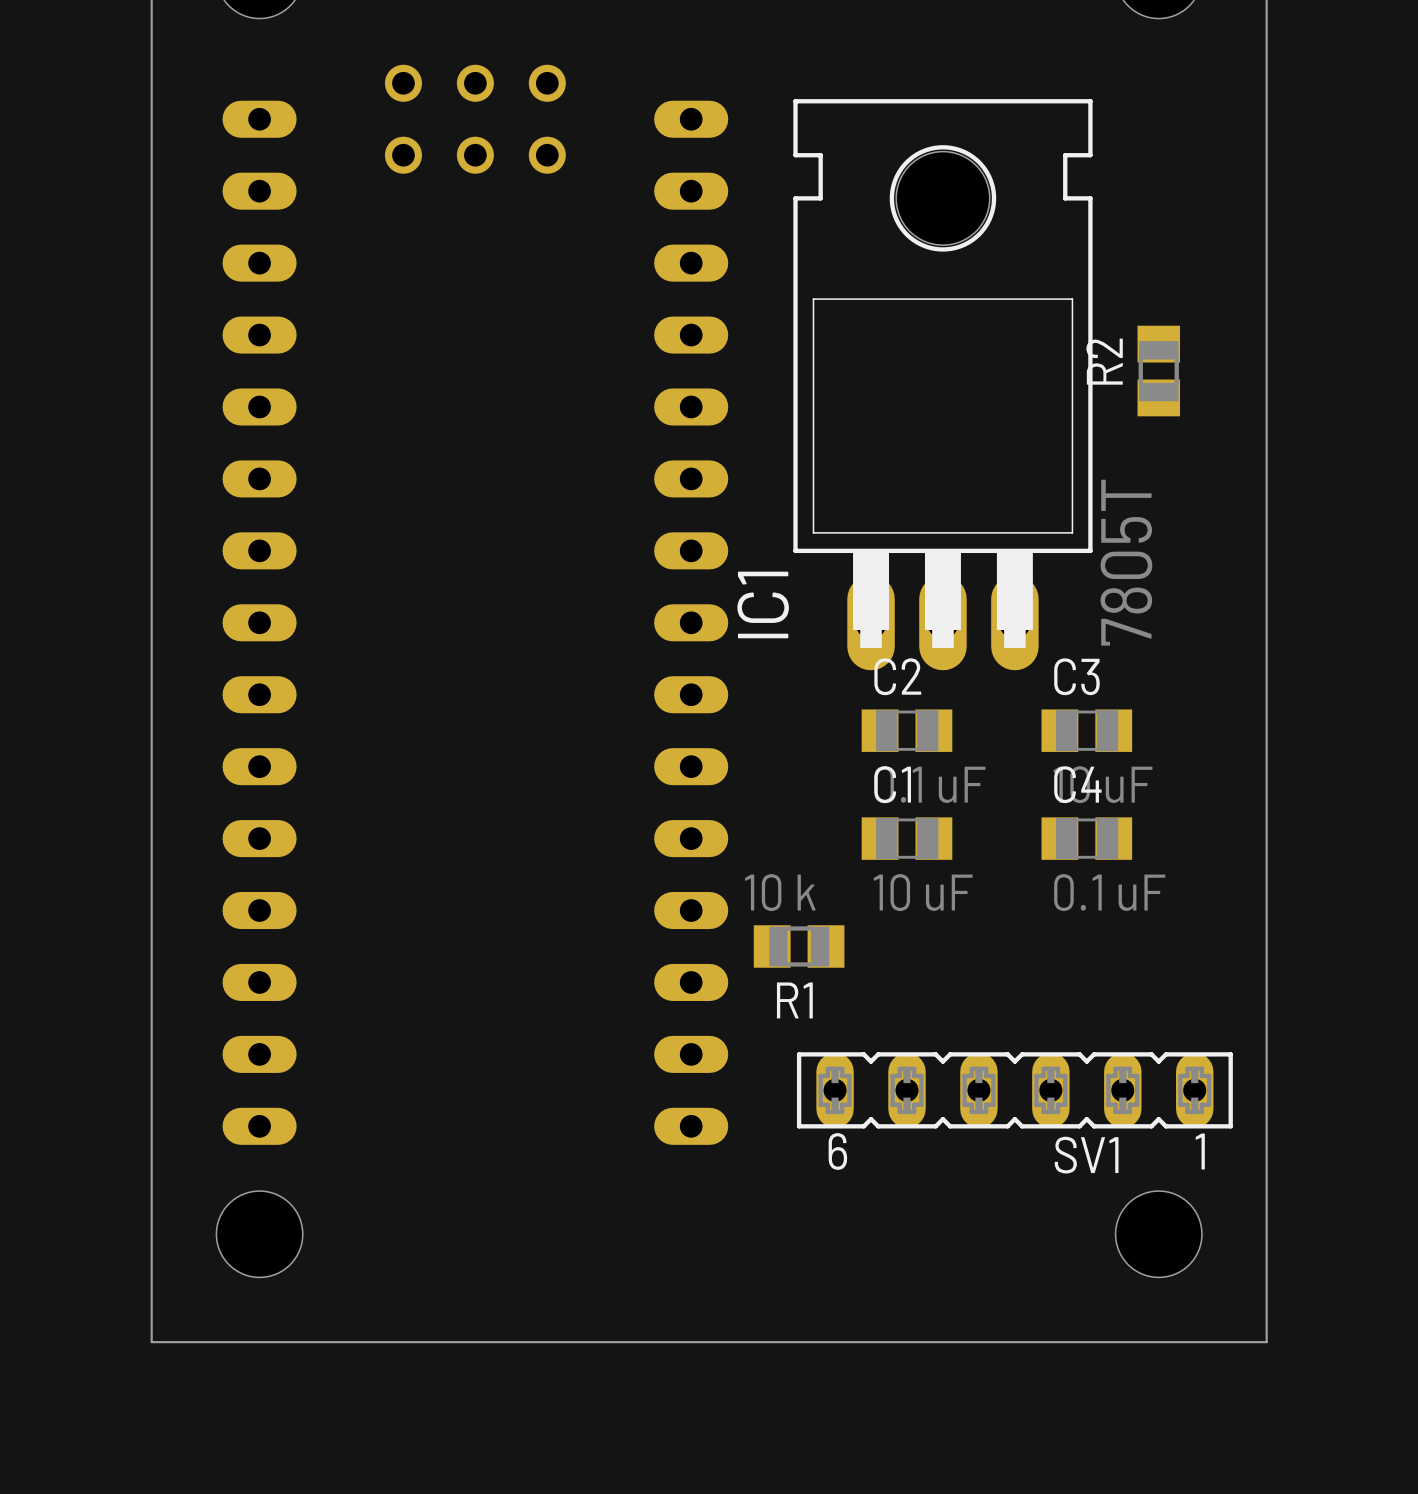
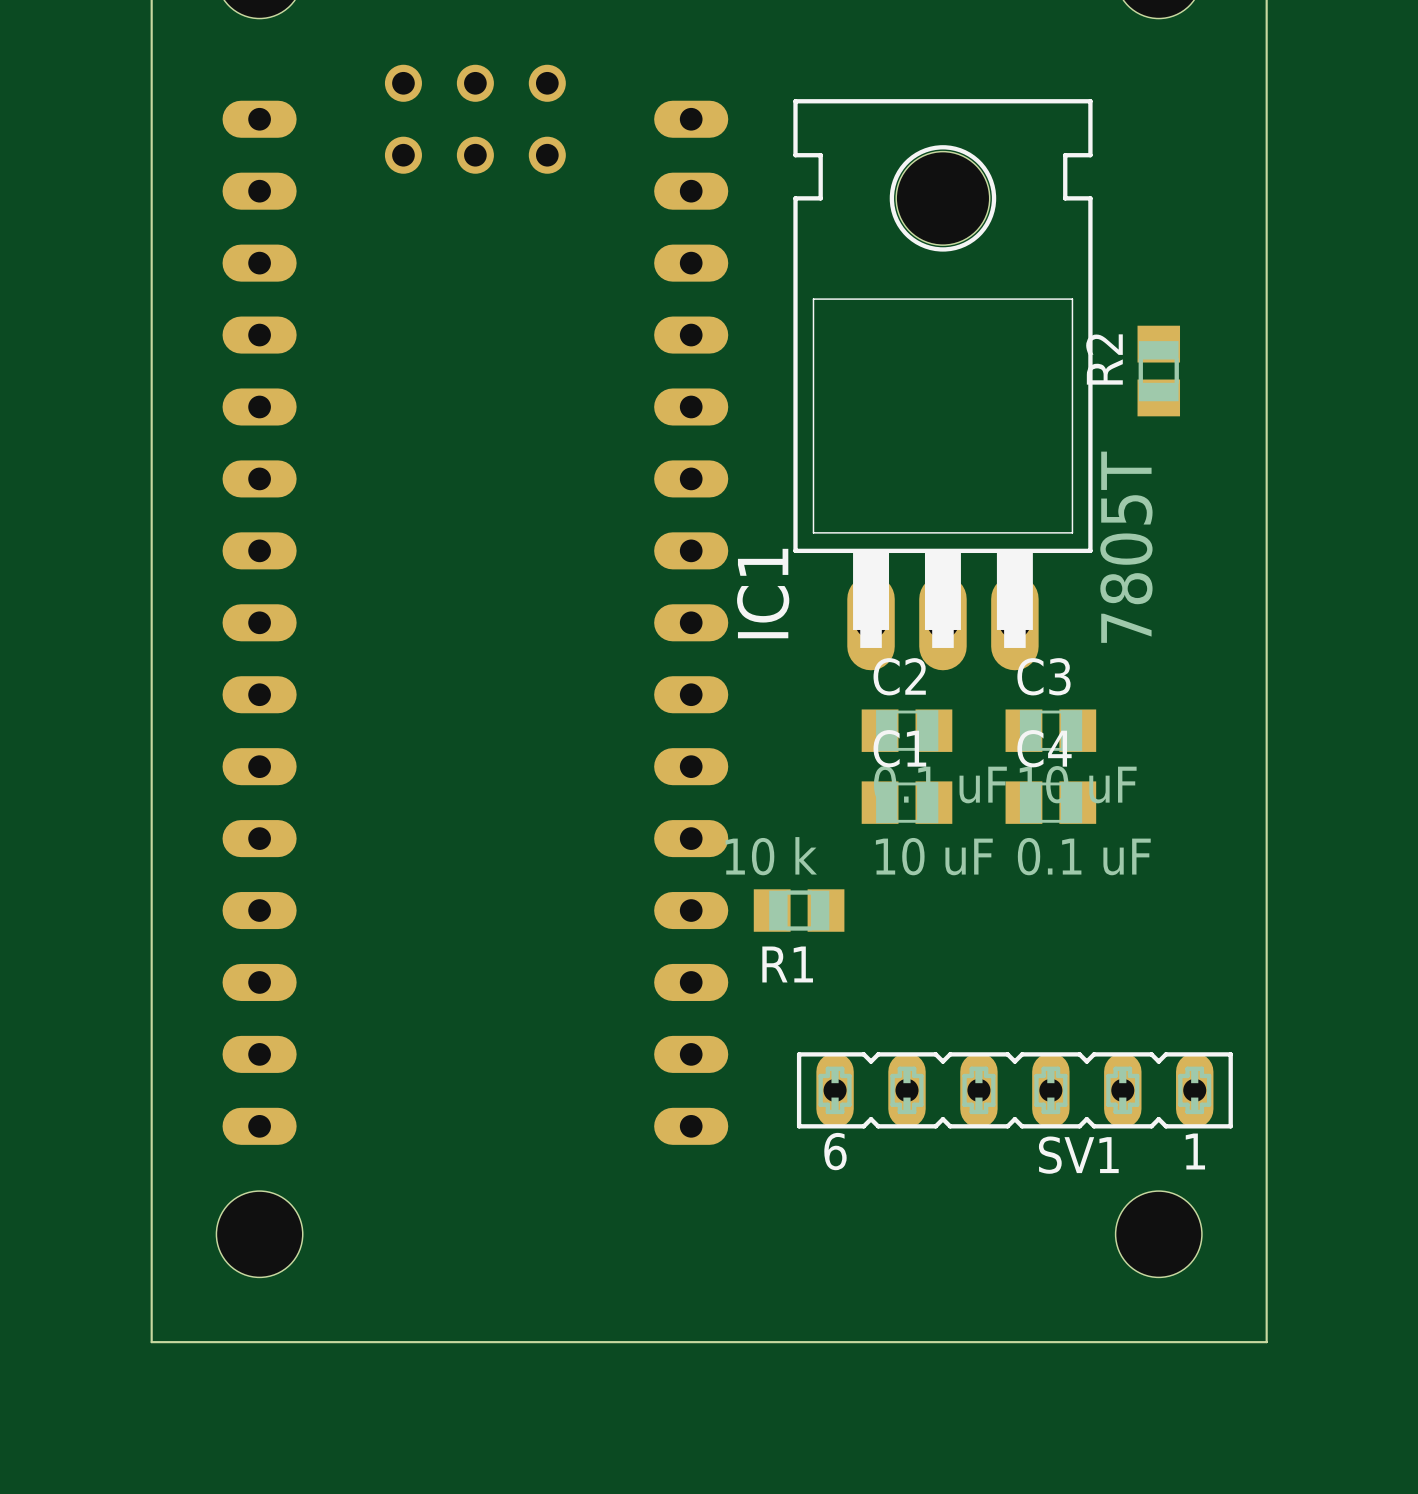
C3 position: (1086, 730) -> (1050, 730)
C1 position: (906, 838) -> (906, 802)
C4 position: (1086, 838) -> (1050, 802)
R1 position: (799, 946) -> (799, 910)

